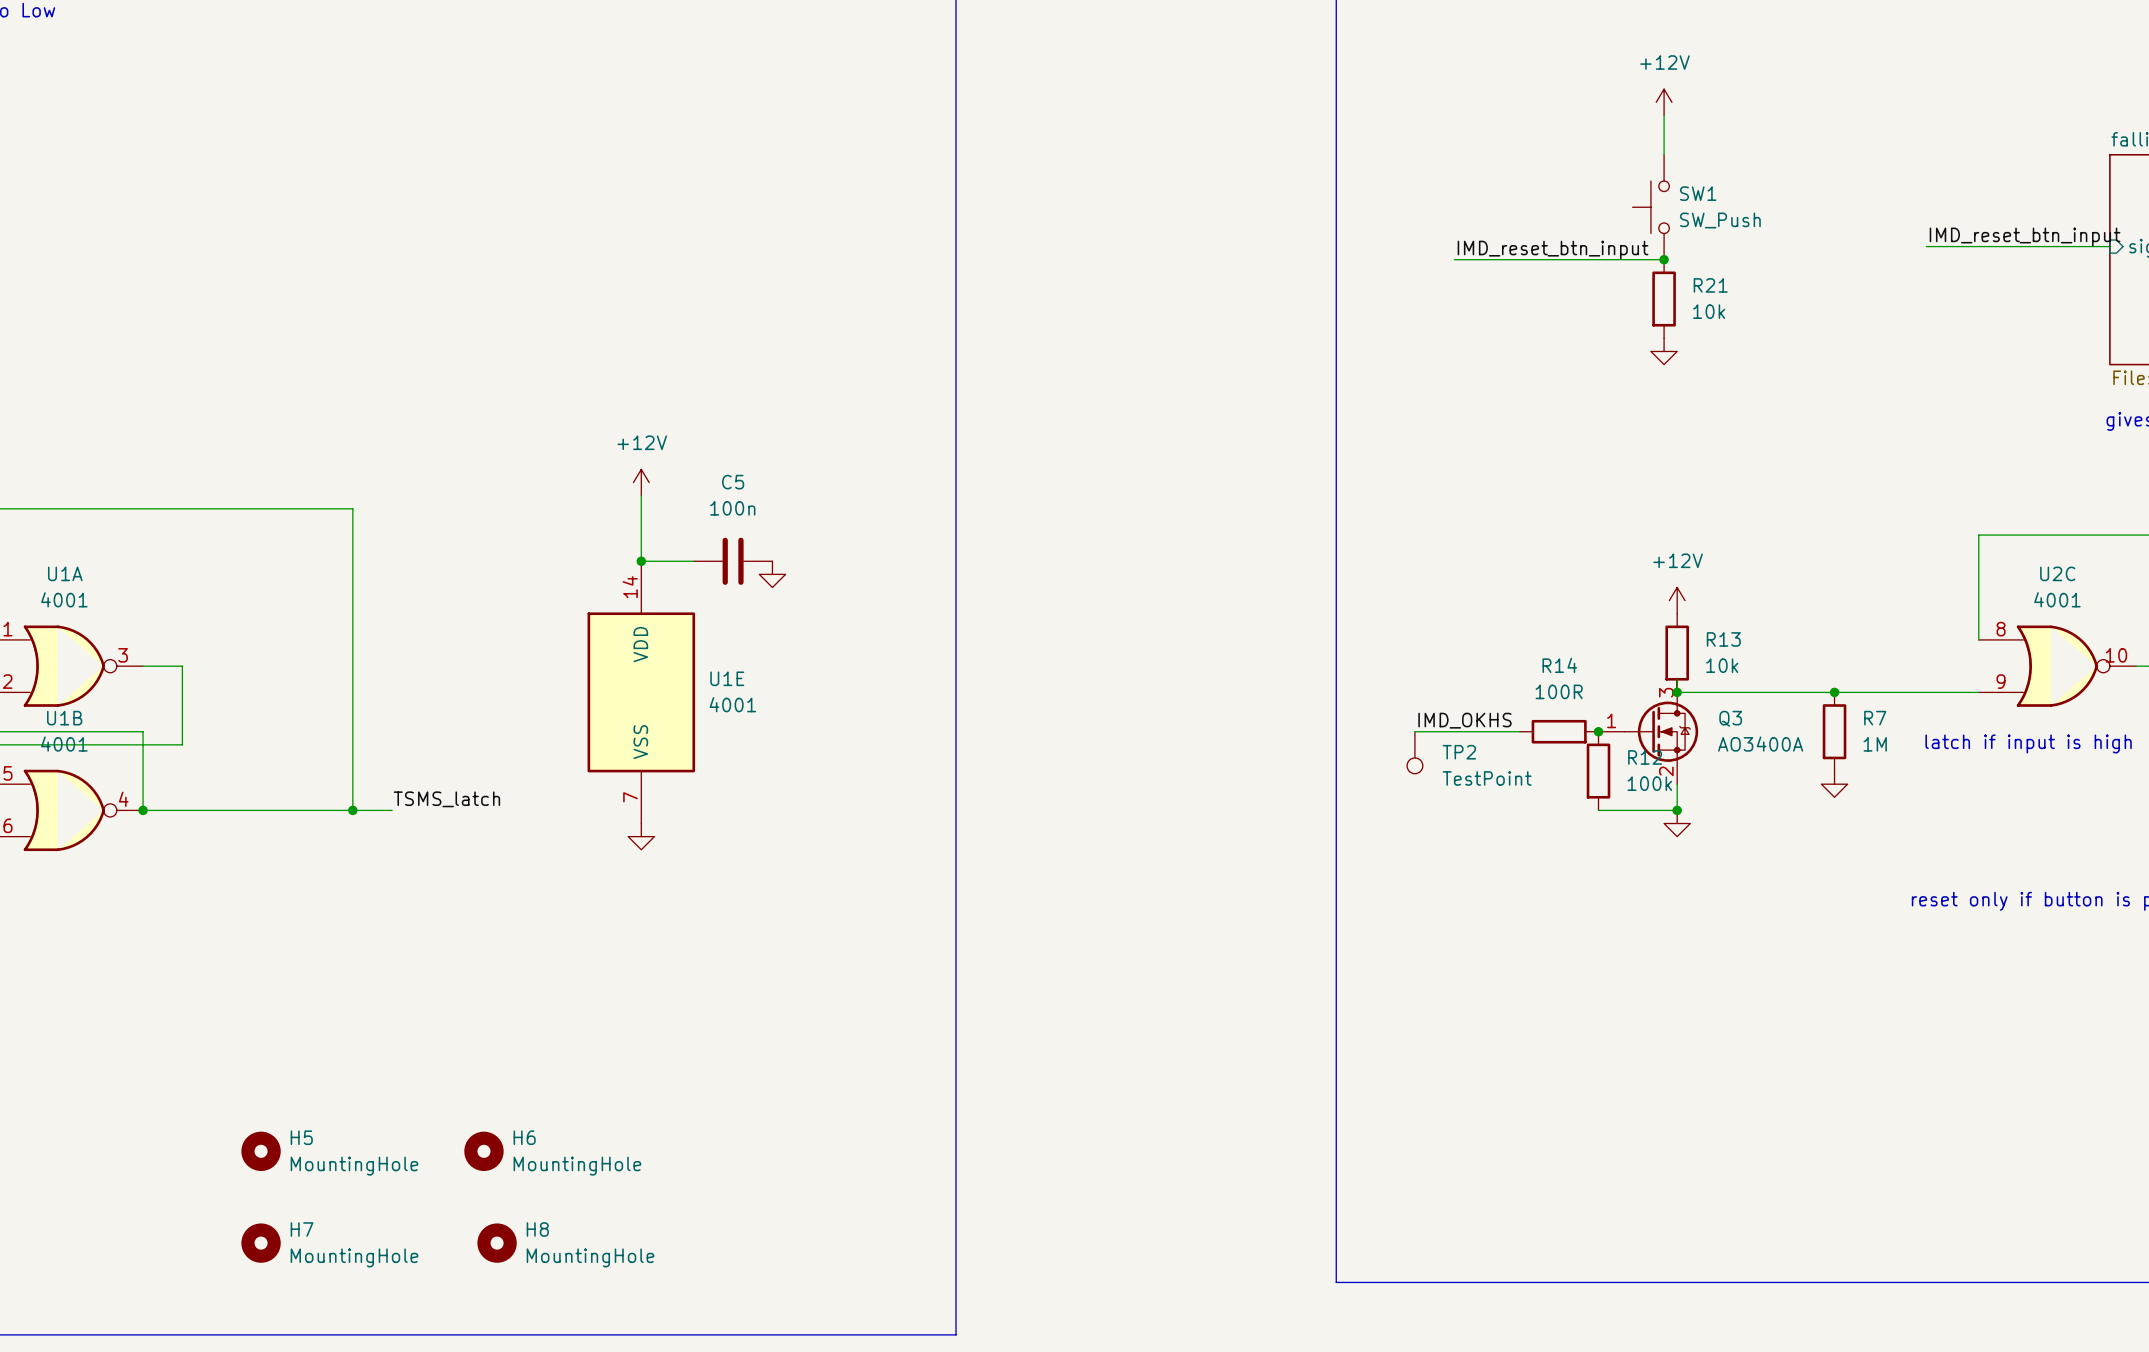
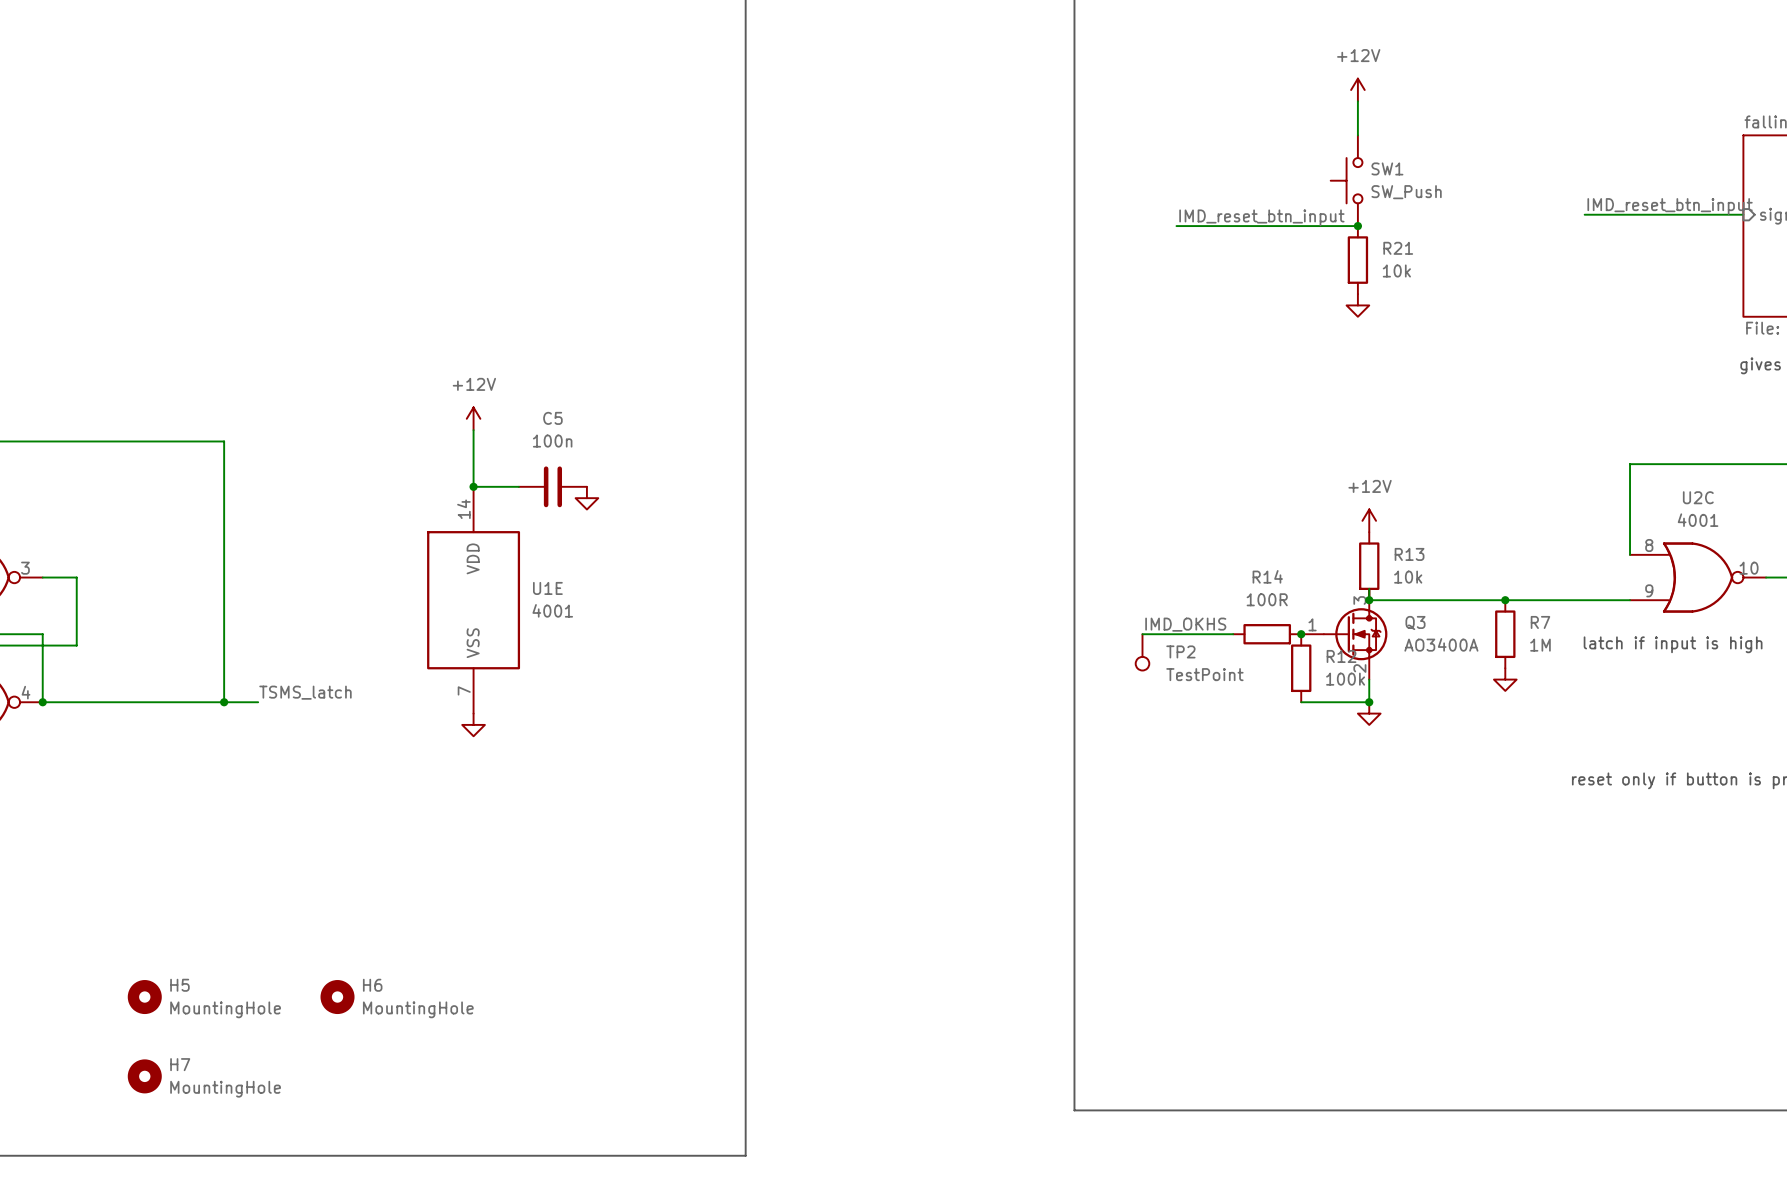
H8: MountingHole (497, 1243) -> none

